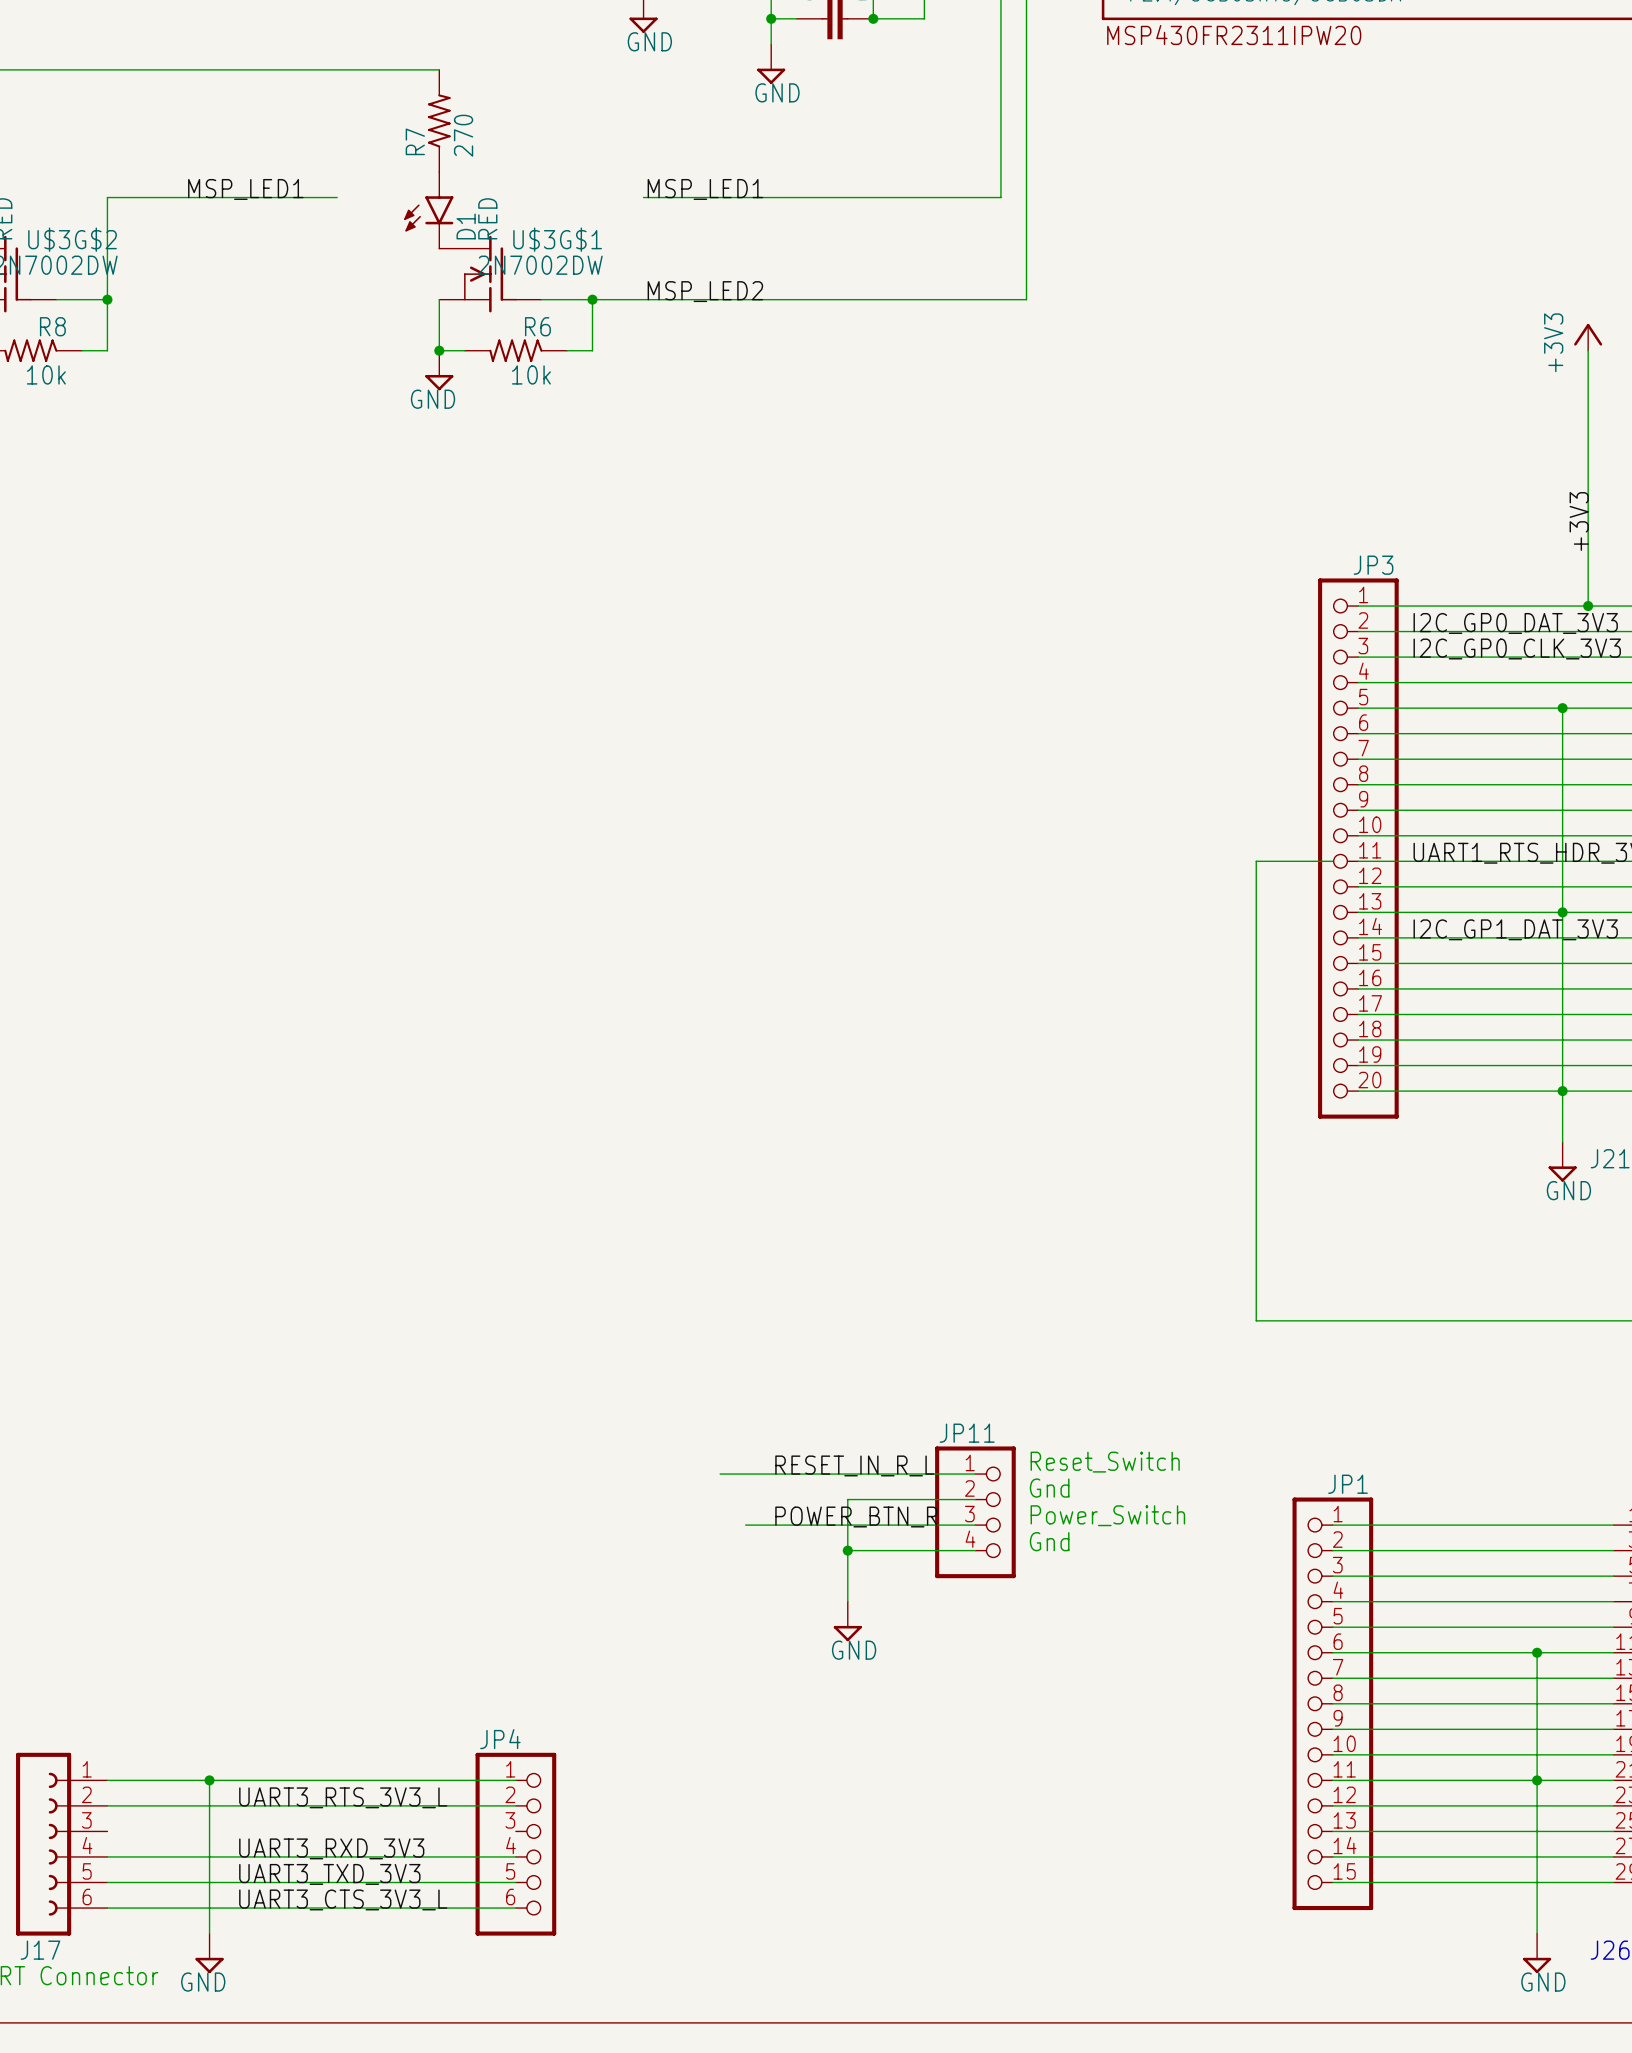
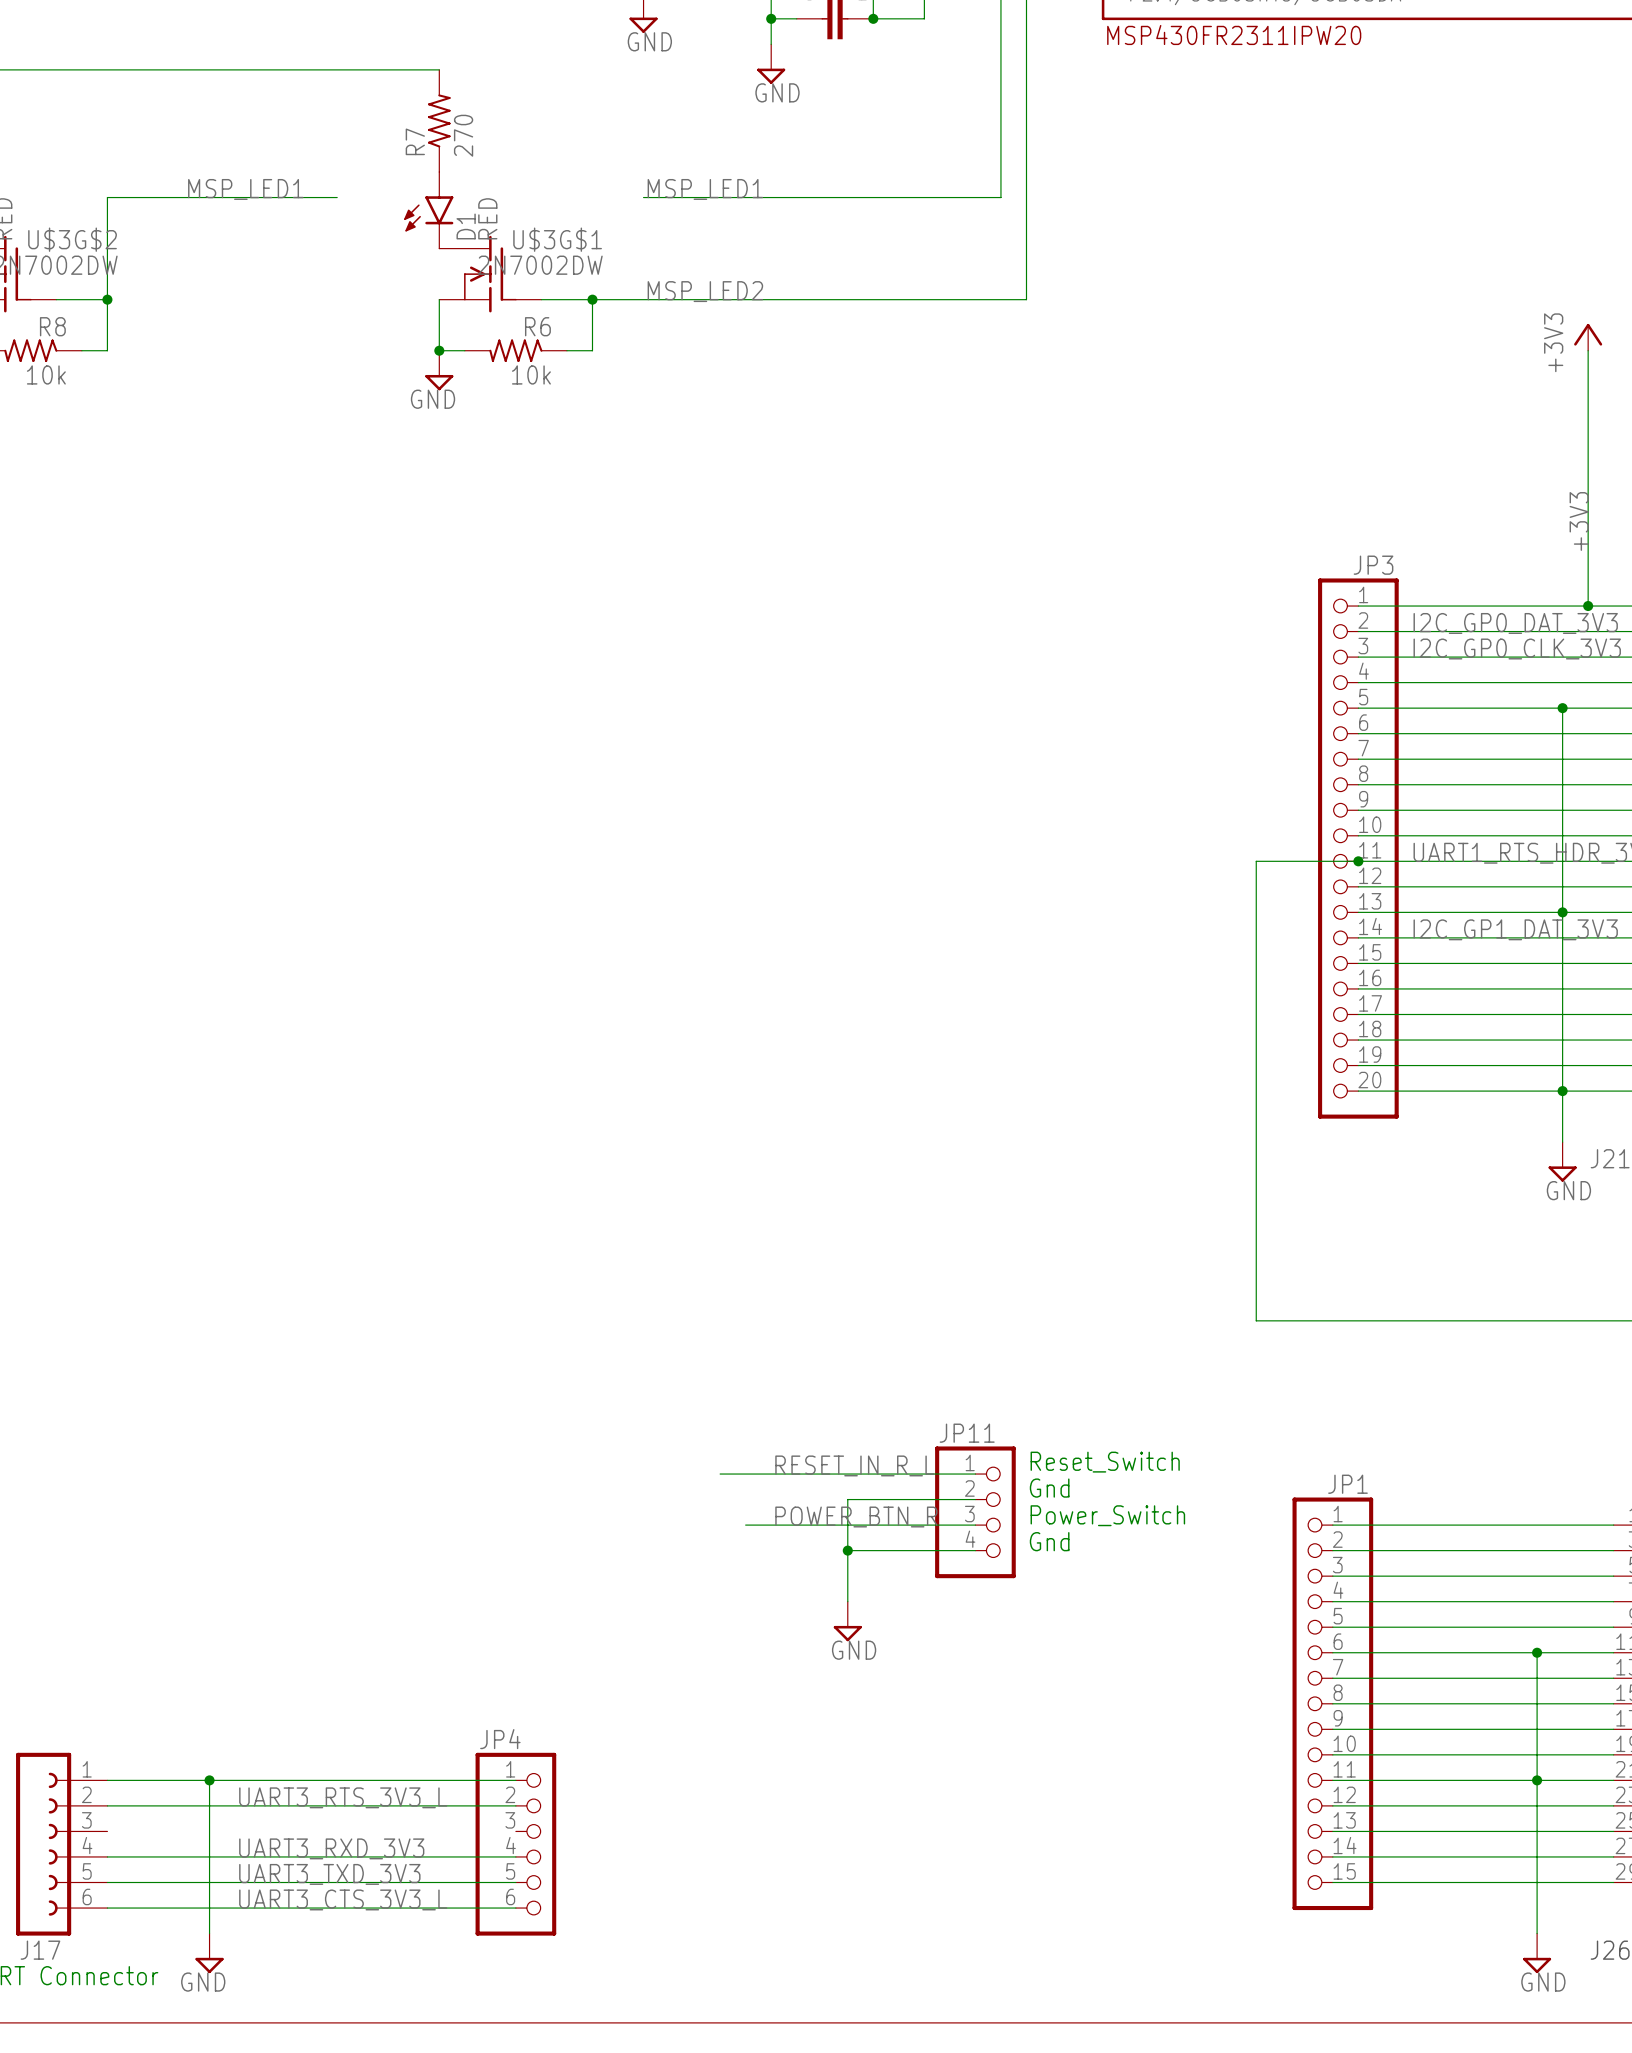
wire: none -> (1332, 861) (1358, 861)
junction: none -> (1358, 861)

